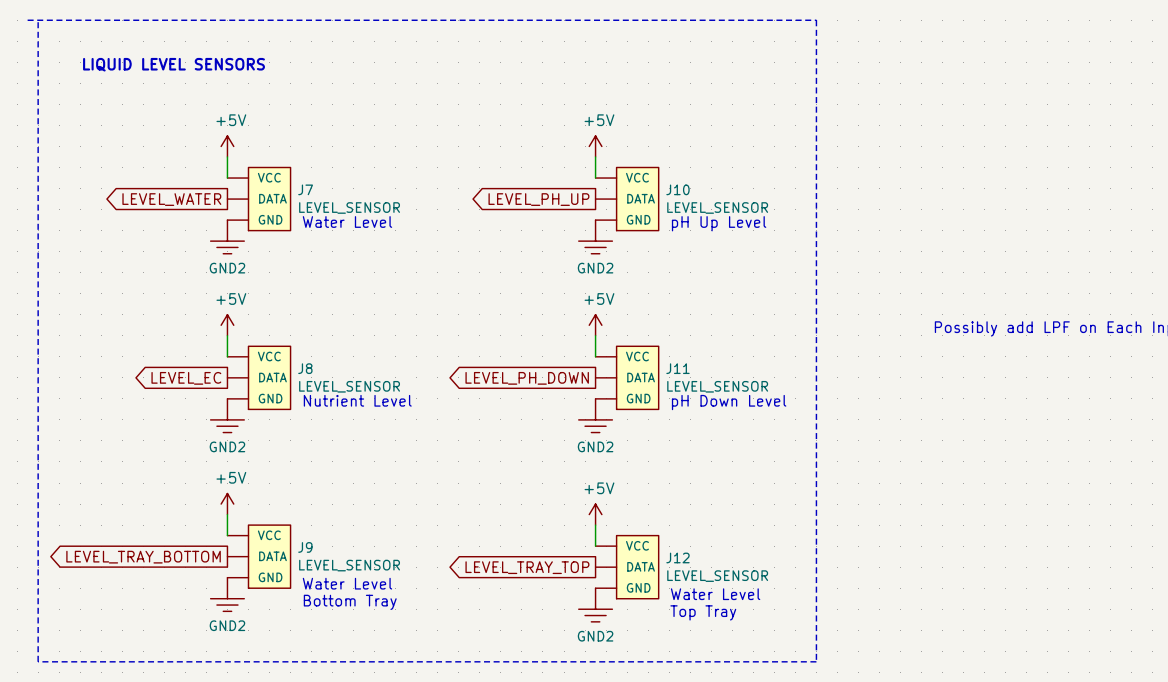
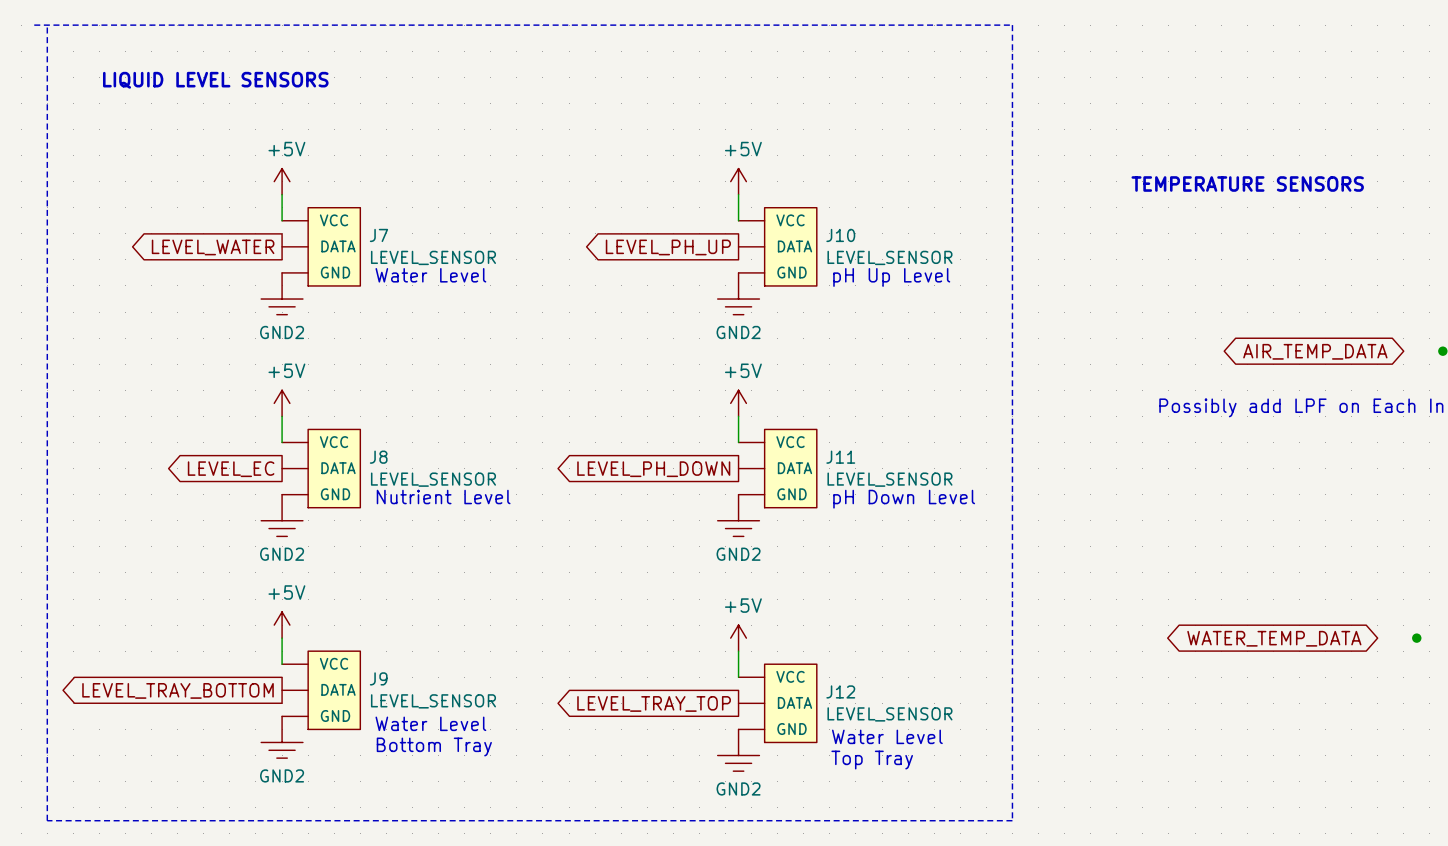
text: none -> TEMPERATURE SENSORS (1247, 183)
global label: none -> AIR_TEMP_DATA (1315, 351)
junction: none -> (1442, 351)
junction: none -> (1416, 638)
global label: none -> WATER_TEMP_DATA (1274, 638)

